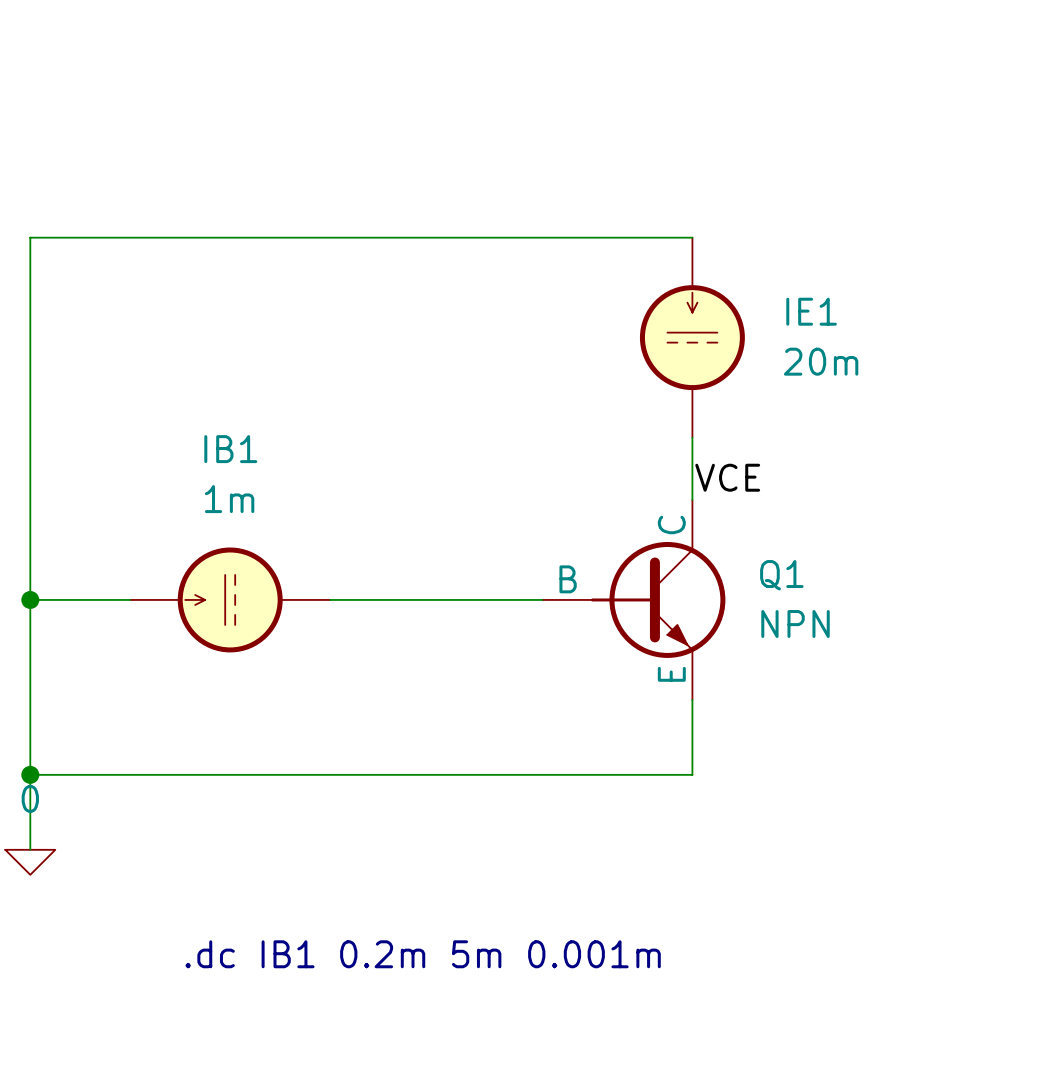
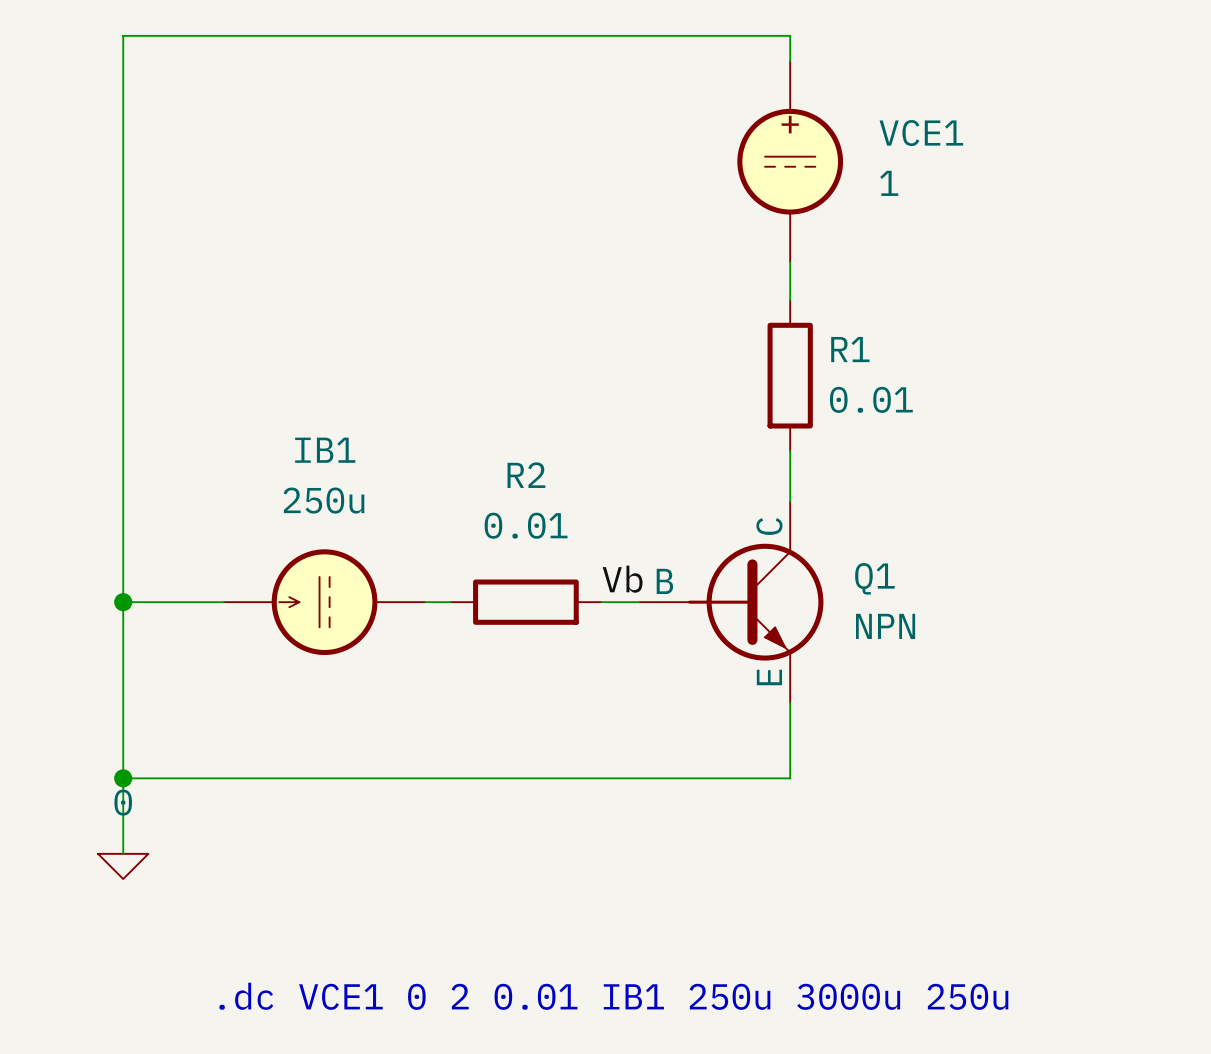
VCE1: none -> 1 (790, 161)
wire: (30, 237) (692, 237) -> (123, 237) (123, 35) (790, 35) (790, 61)
IE1: 20m (692, 337) -> none
R1: none -> 0.01 (790, 375)
label: VCE (727, 477) -> none
IB1 value: 1m (229, 499) -> 250u (323, 500)
label: none -> Vb (622, 579)
wire: (355, 599) (505, 599) -> none
R2: none -> 0.01 (525, 602)
text: .dc IB1 0.2m 5m 0.001m (423, 954) -> none
text: none -> .dc VCE1 0 2 0.01 IB1 250u 3000u 250u (613, 996)

